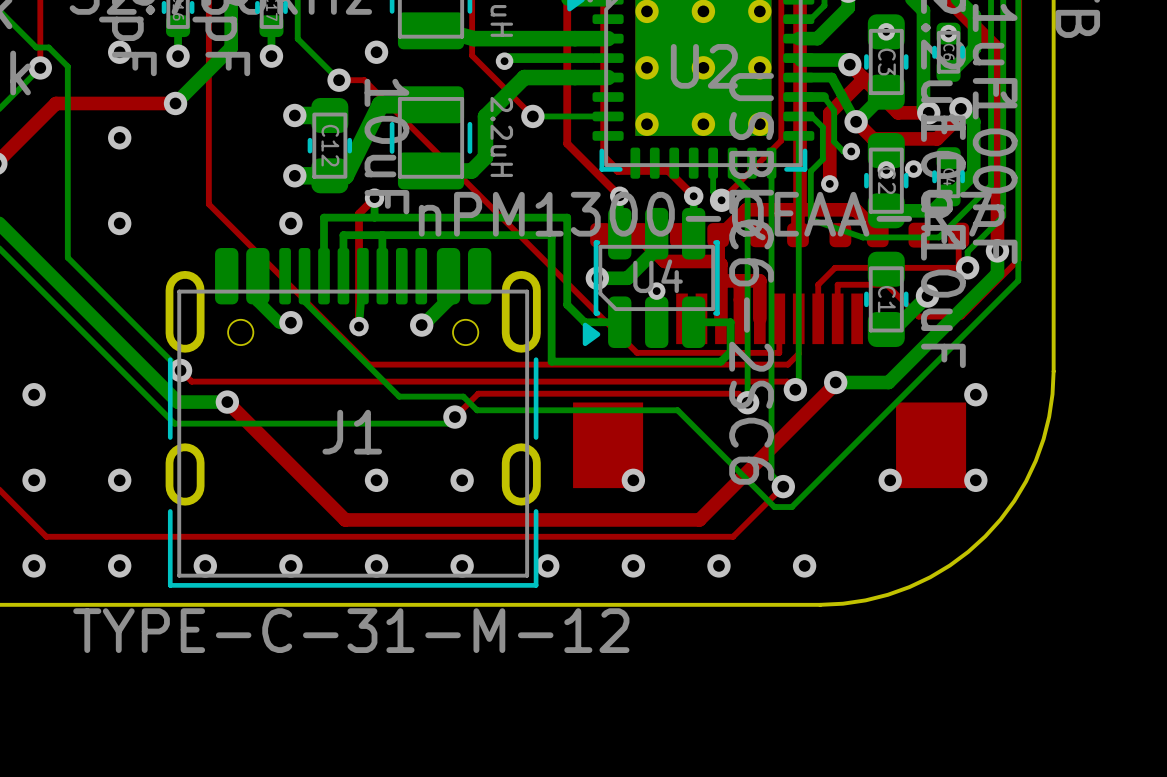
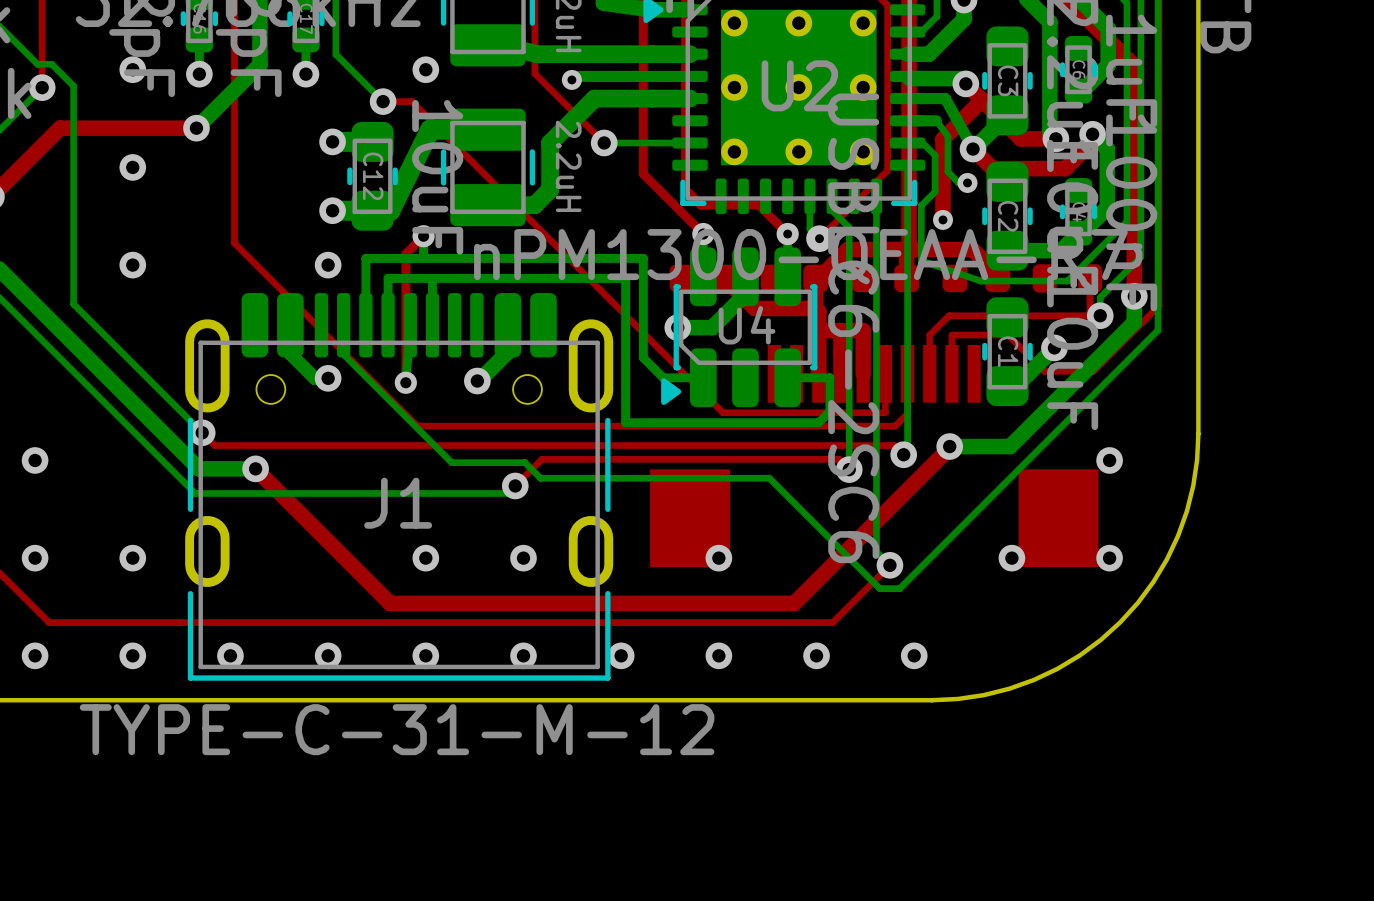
via: (886, 31) -> none
via: (948, 33) -> none
via: (886, 169) -> none
via: (913, 169) -> none
via: (656, 291) -> none

